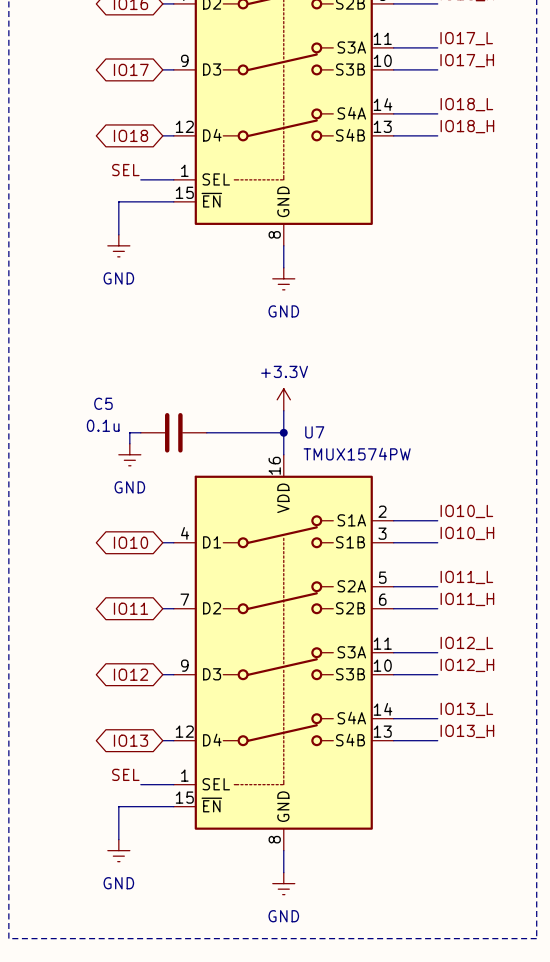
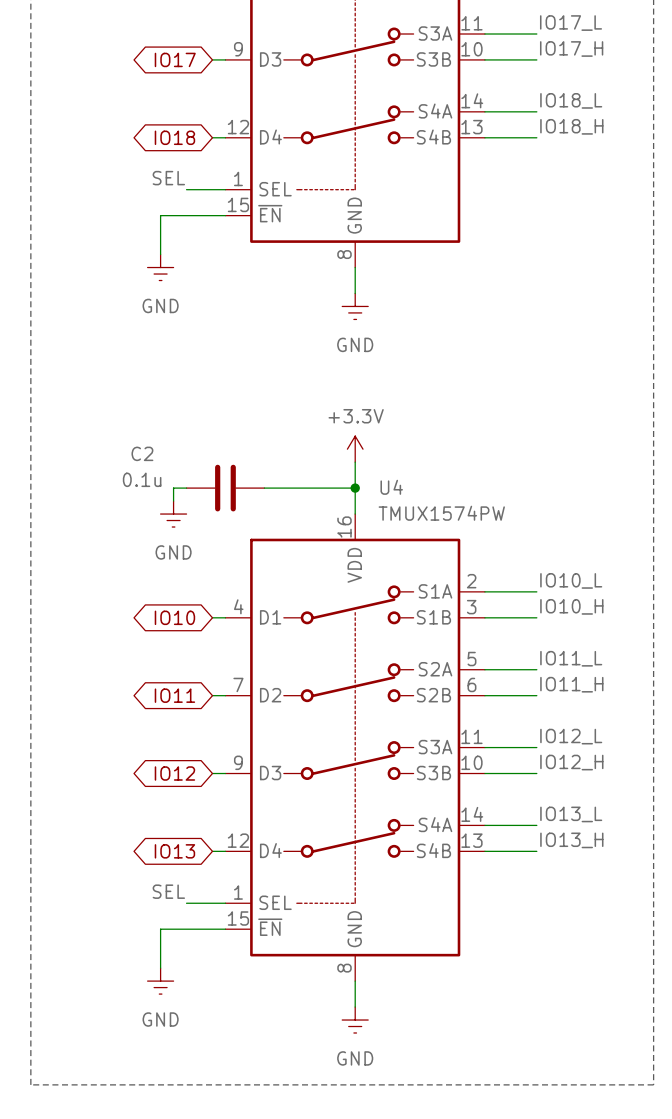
C5 name: C5 (103, 403) -> C2 (142, 453)
U7 name: U7 (314, 432) -> U4 (391, 487)

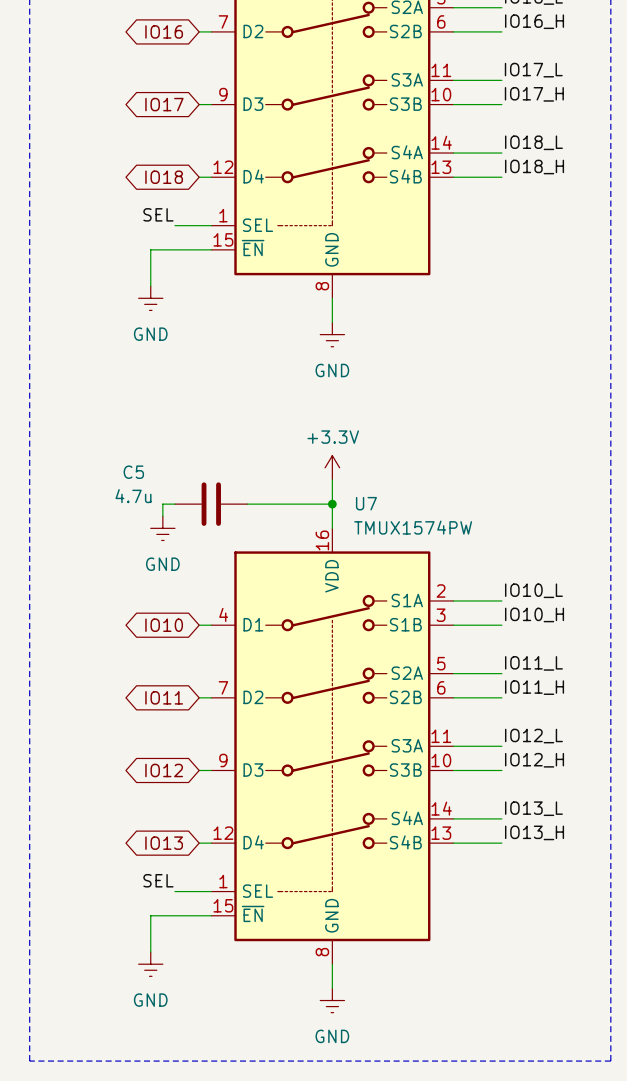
C2 name: C2 (142, 453) -> C5 (133, 472)
C2 value: 0.1u (142, 479) -> 4.7u (133, 496)
U4 name: U4 (391, 487) -> U7 (366, 503)

